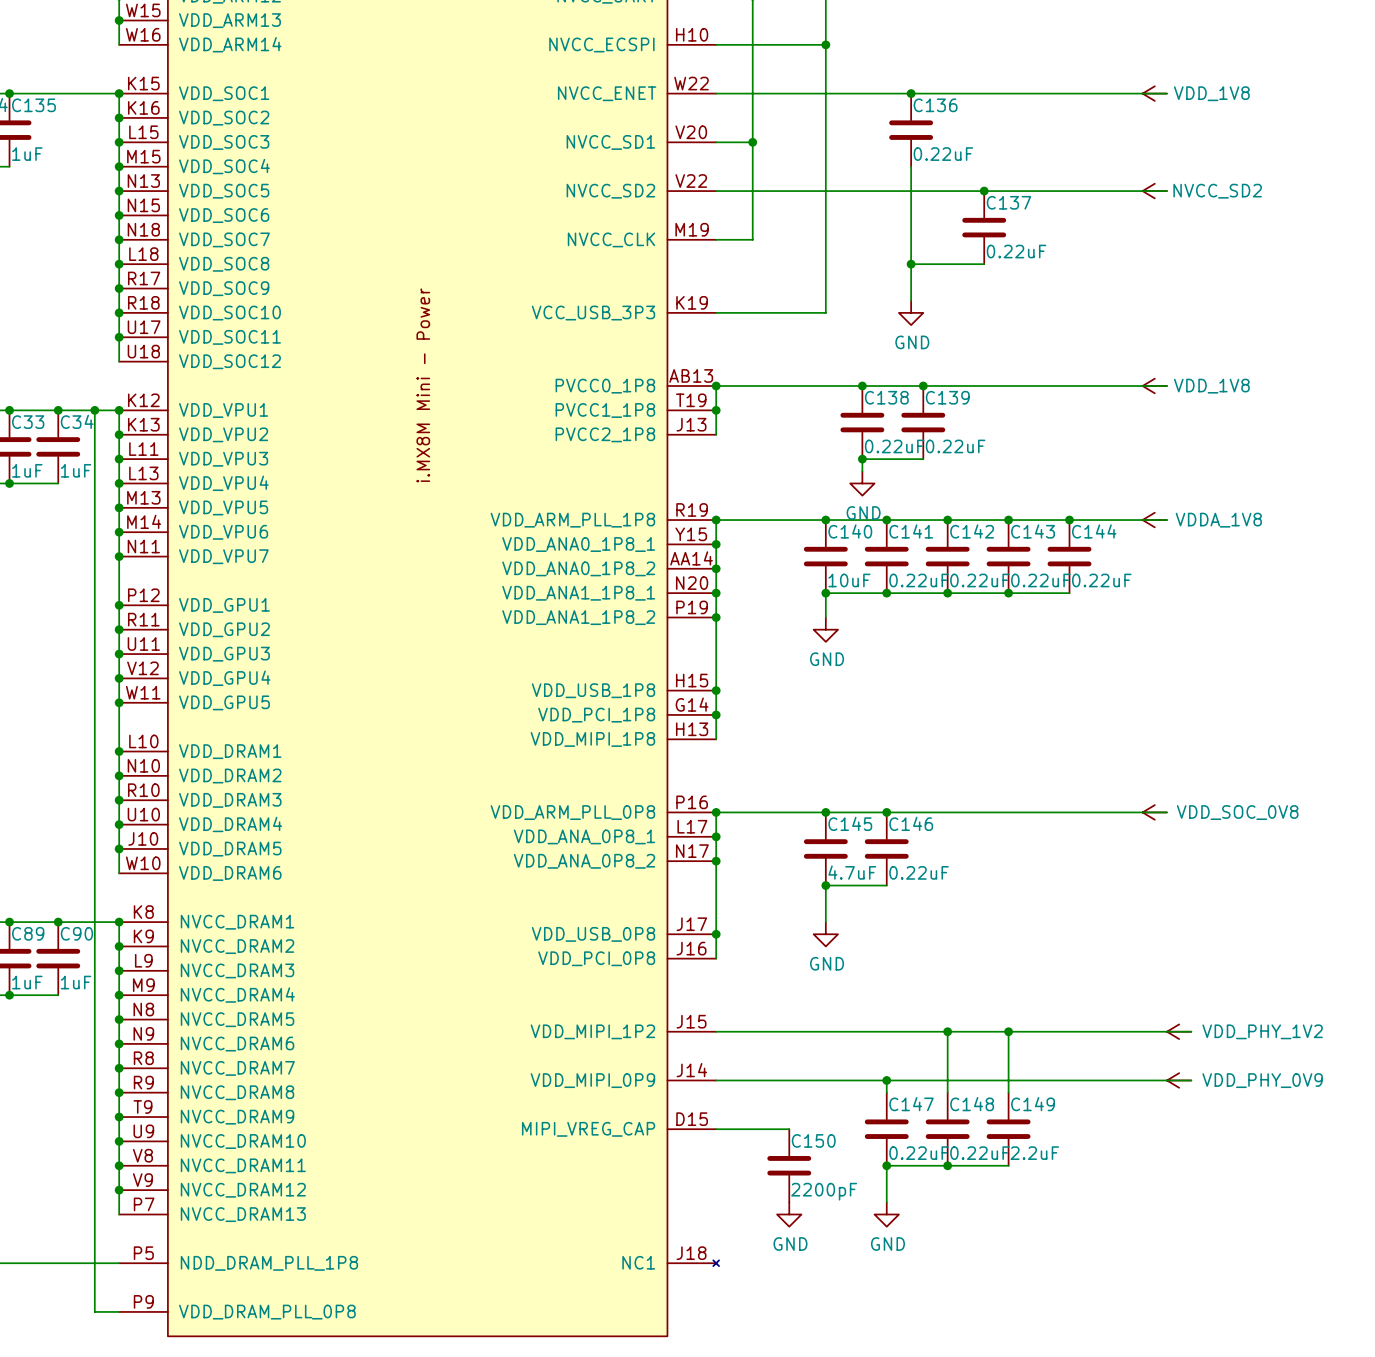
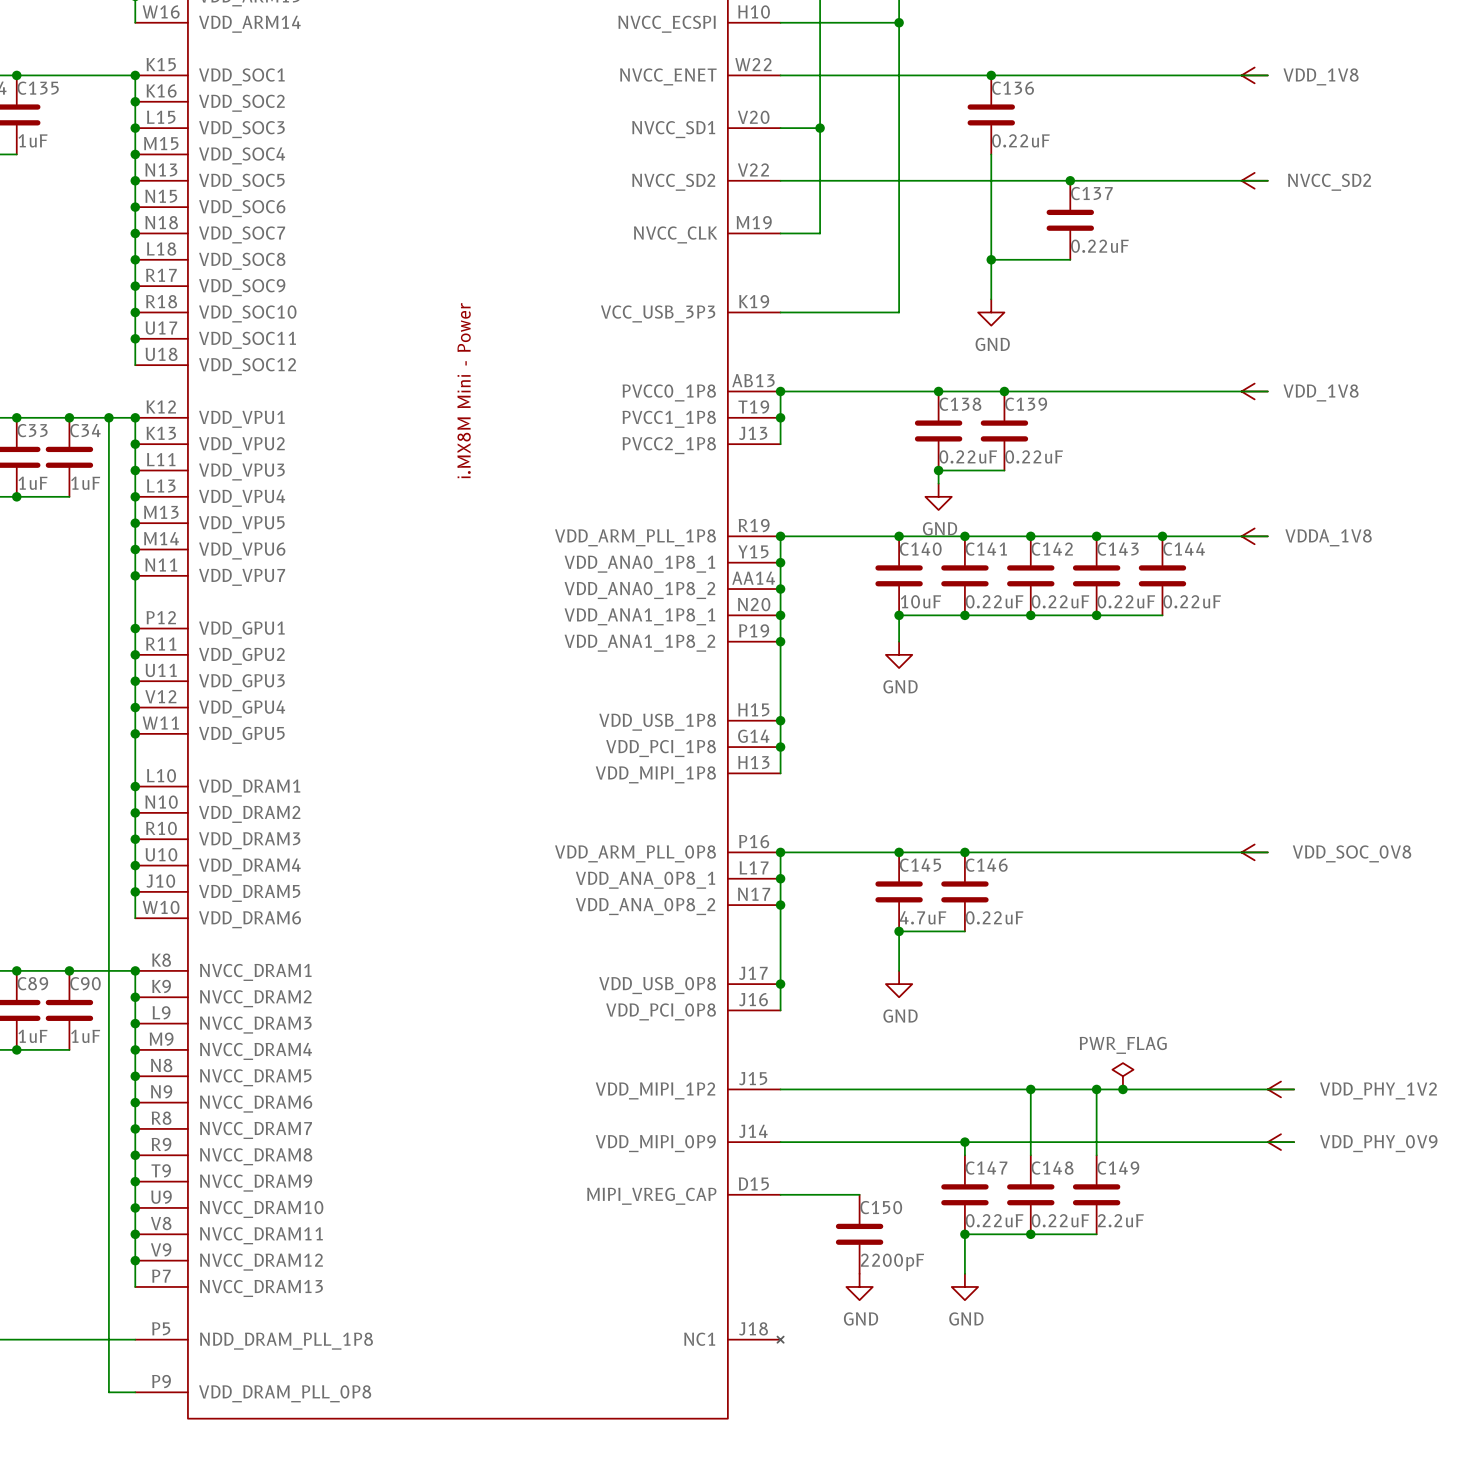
power symbol: none -> PWR_FLAG (1122, 1076)
junction: none -> (1122, 1089)

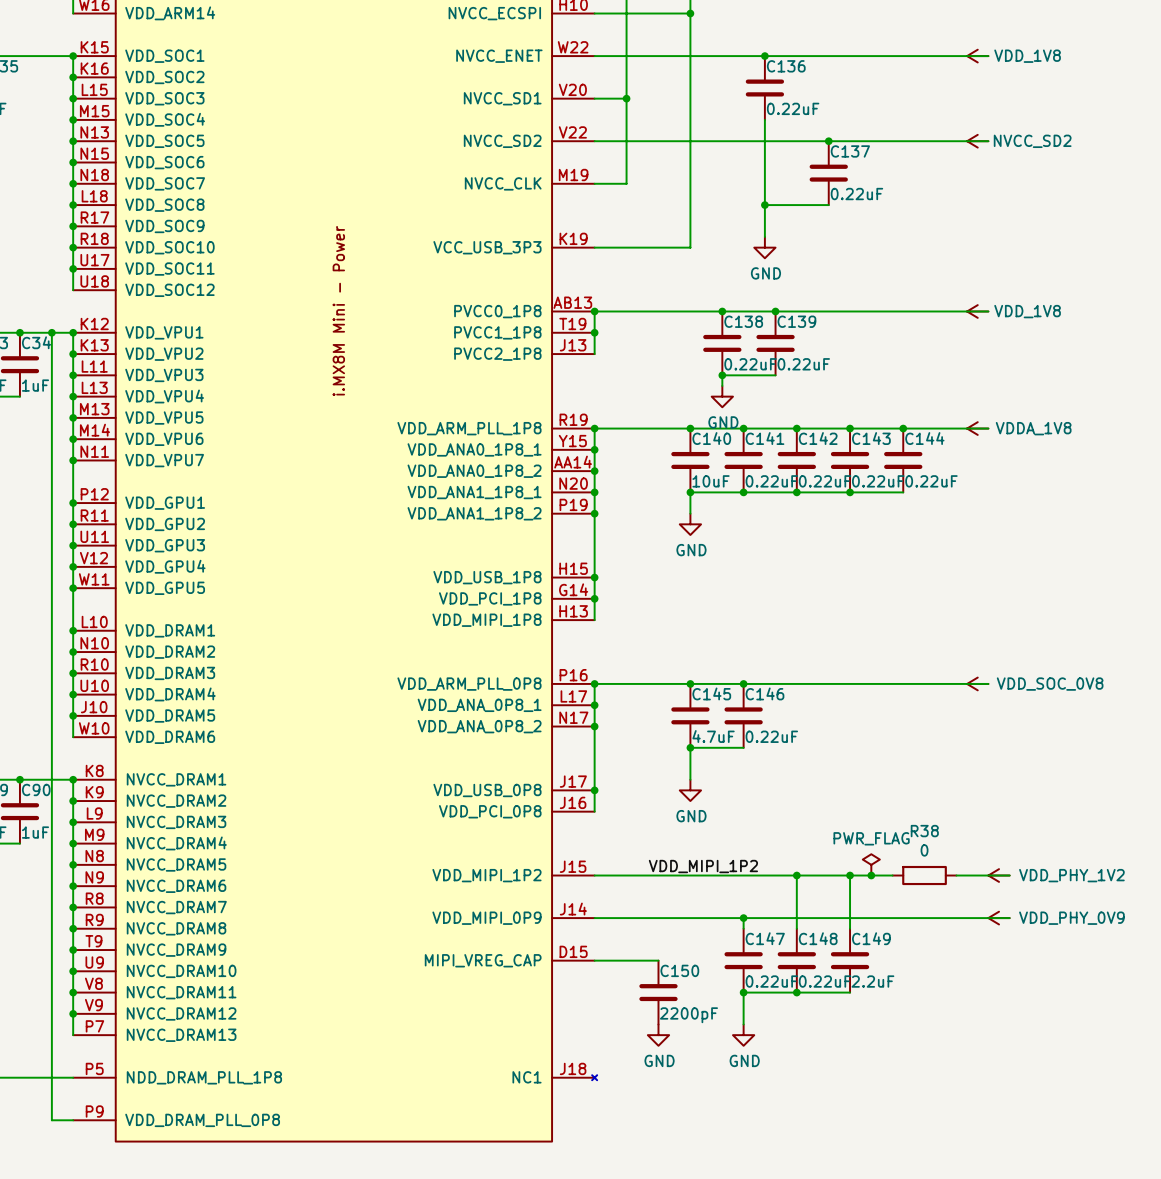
label: none -> VDD_MIPI_1P2 (703, 866)
wire: (1149, 1089) (1228, 1089) -> none
R38: none -> 0 (924, 875)

